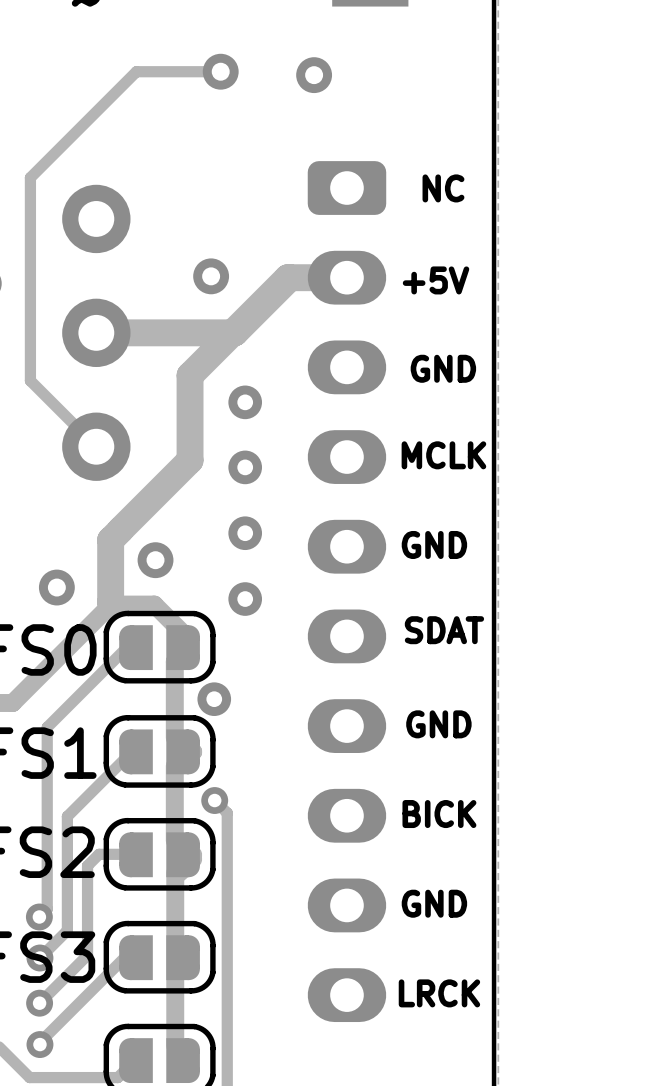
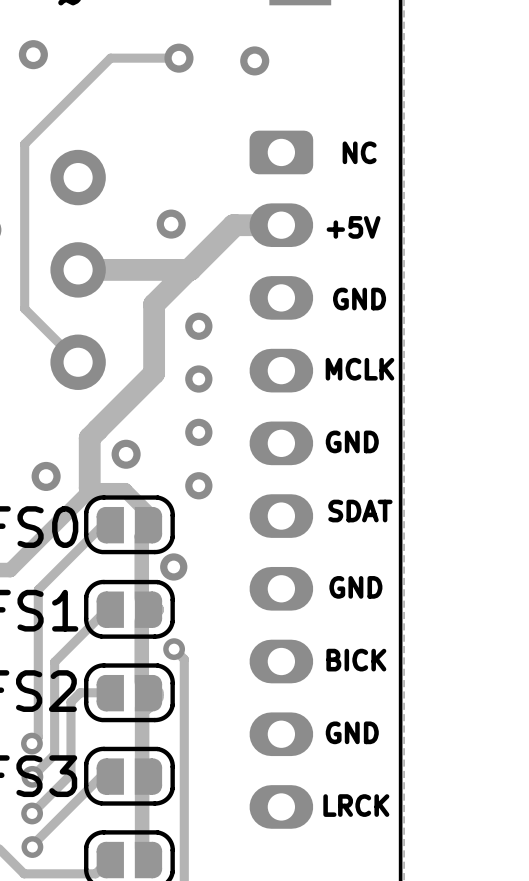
via: none -> (33, 54)

